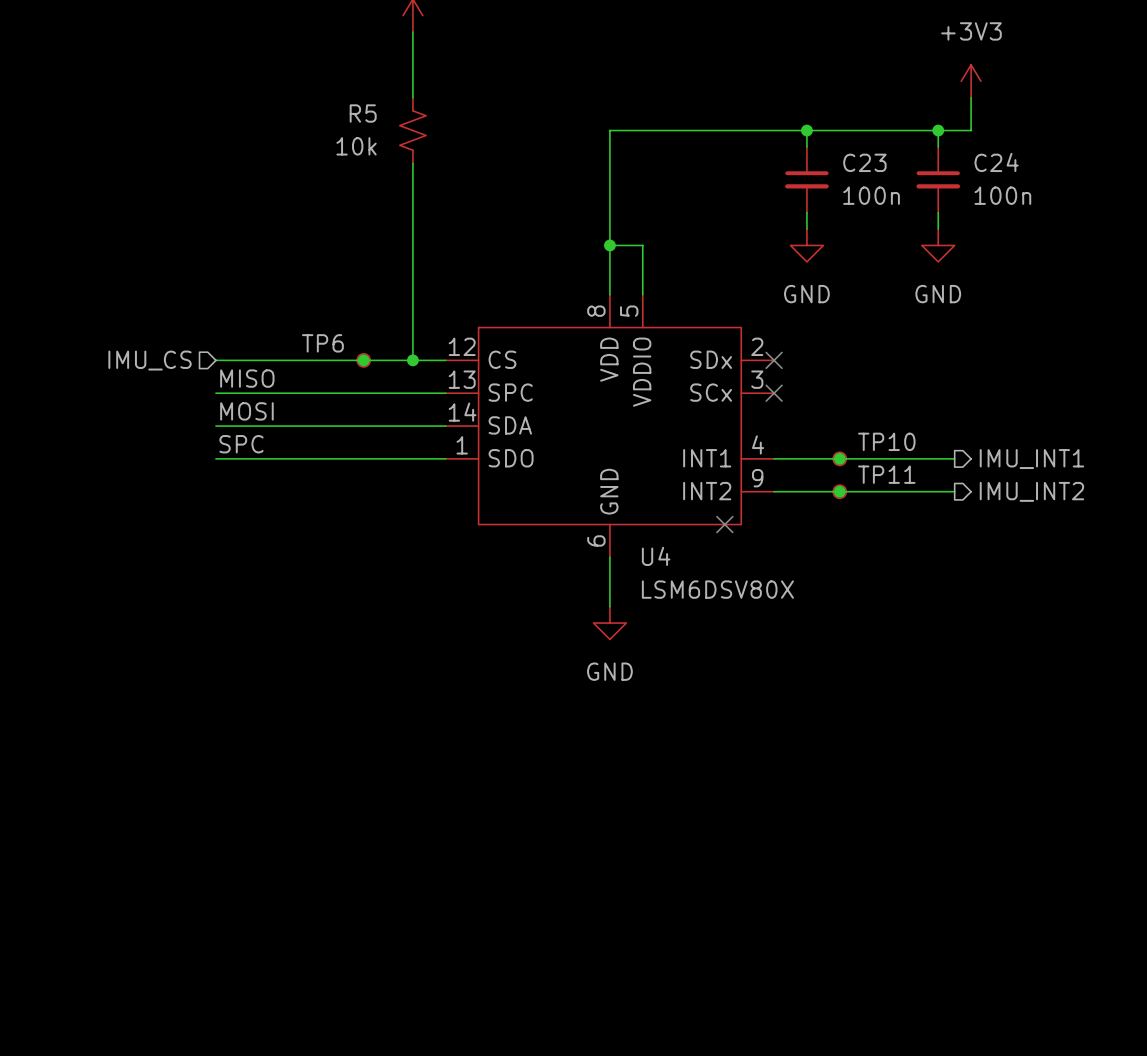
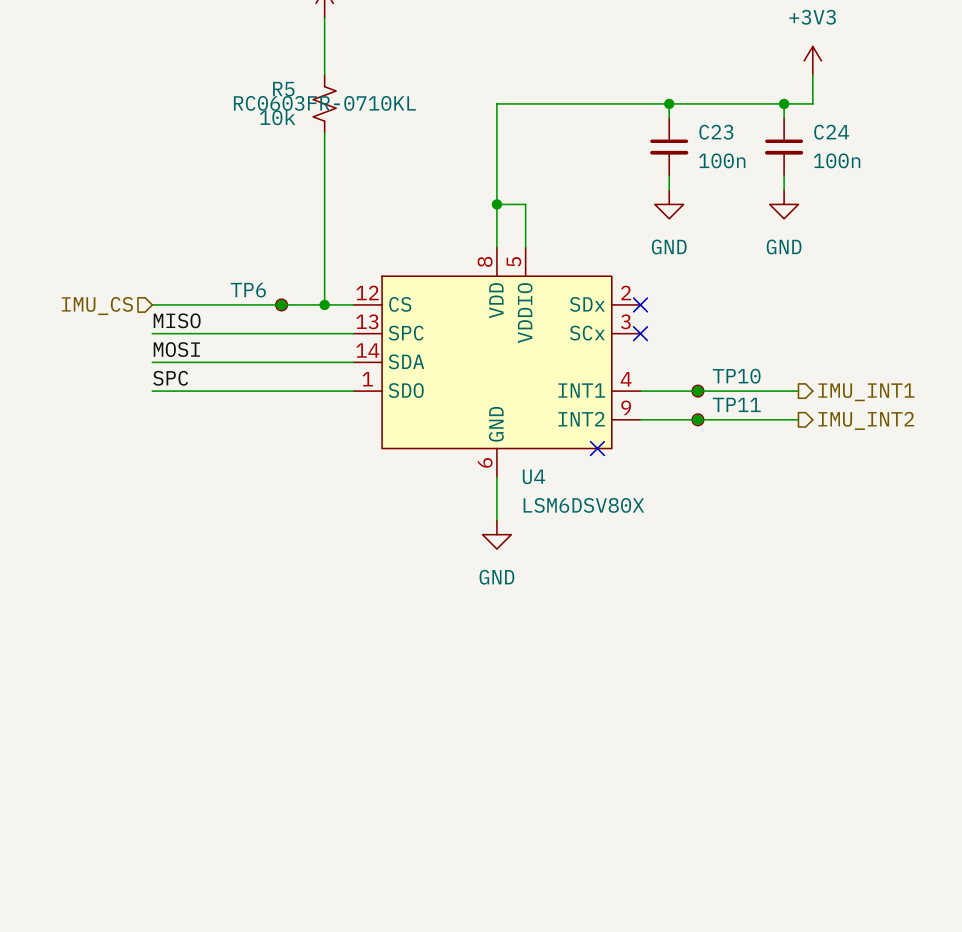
R5 text: none -> RC0603FR-0710KL (324, 103)

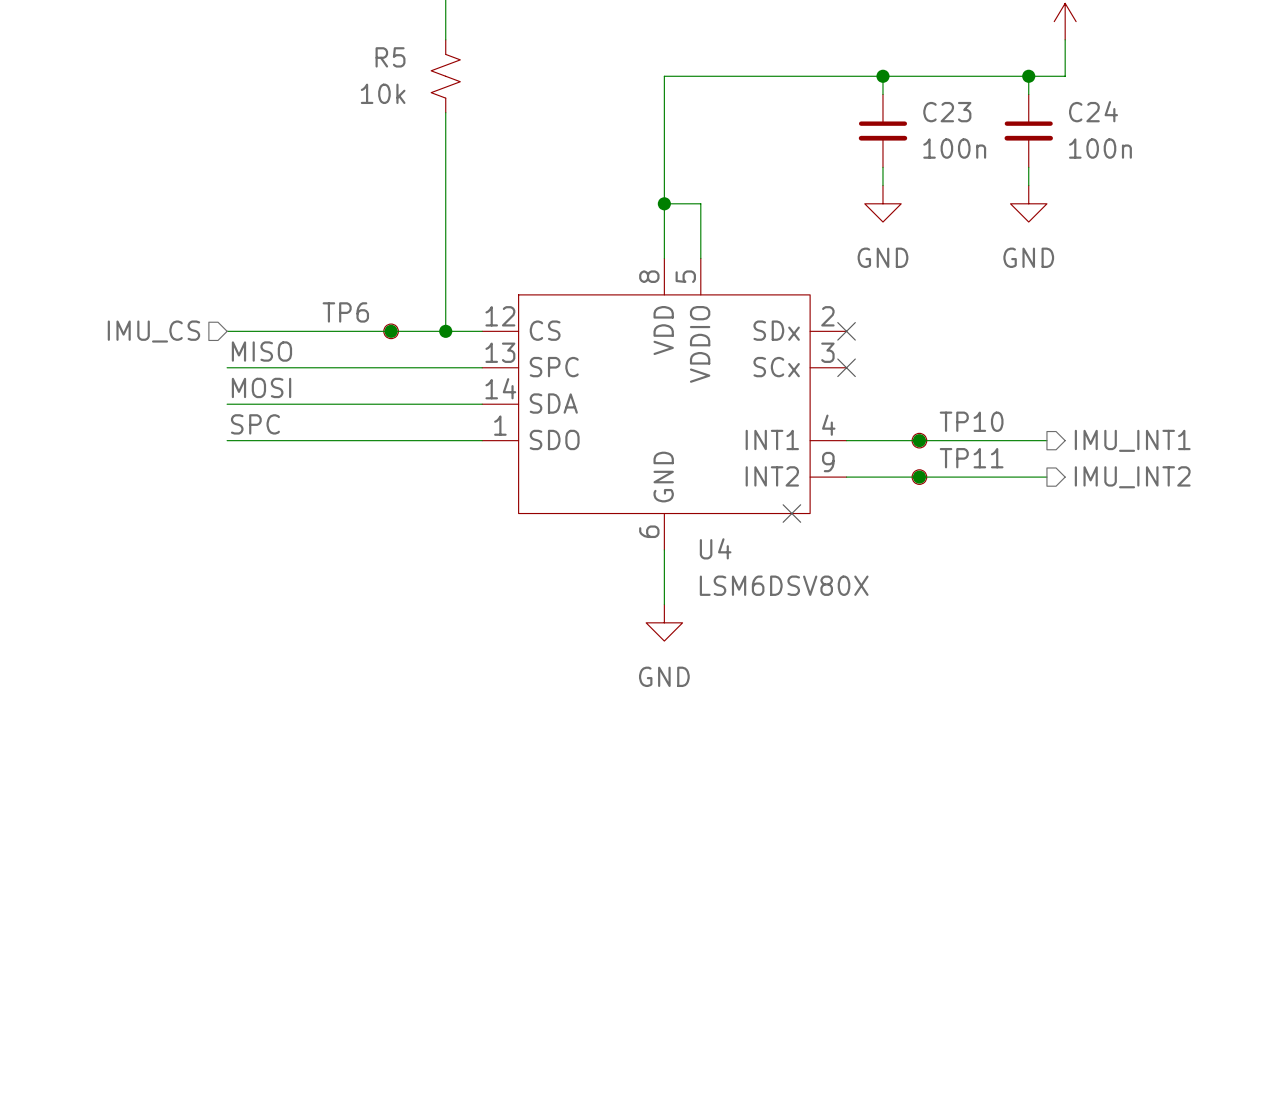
R5 text: RC0603FR-0710KL (324, 103) -> none

